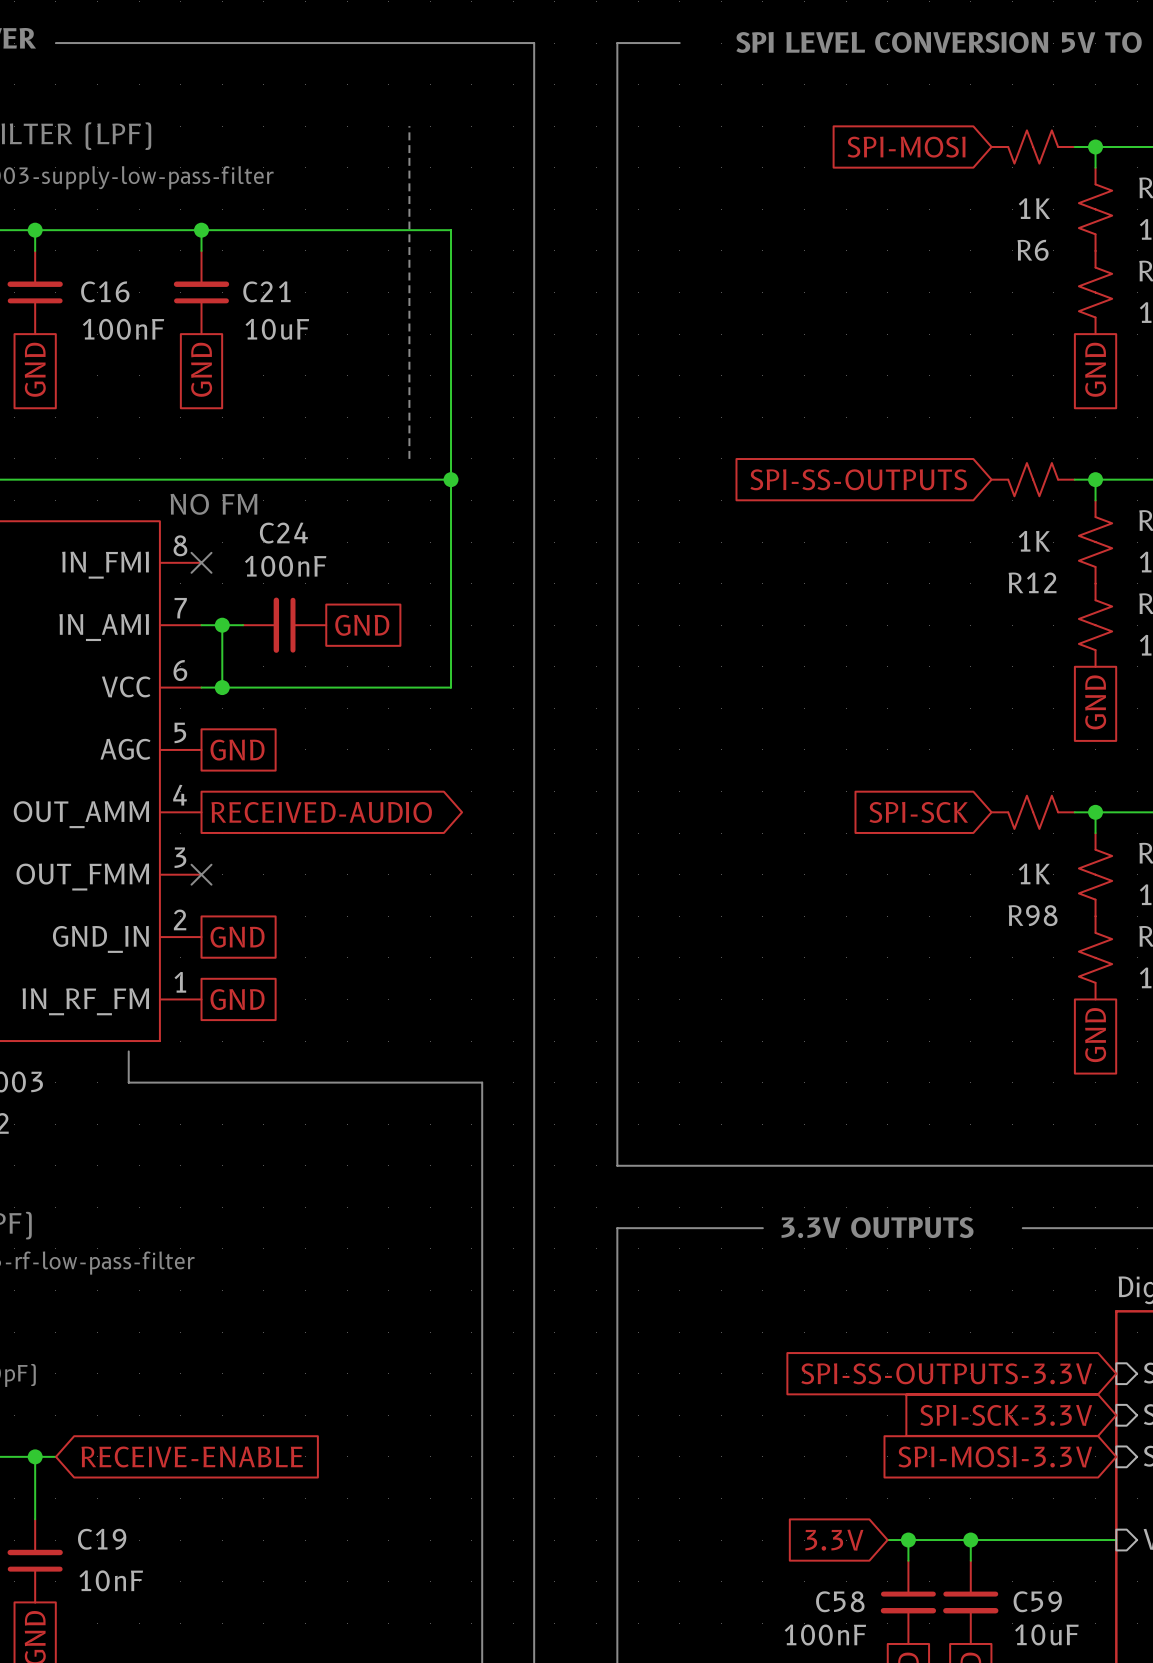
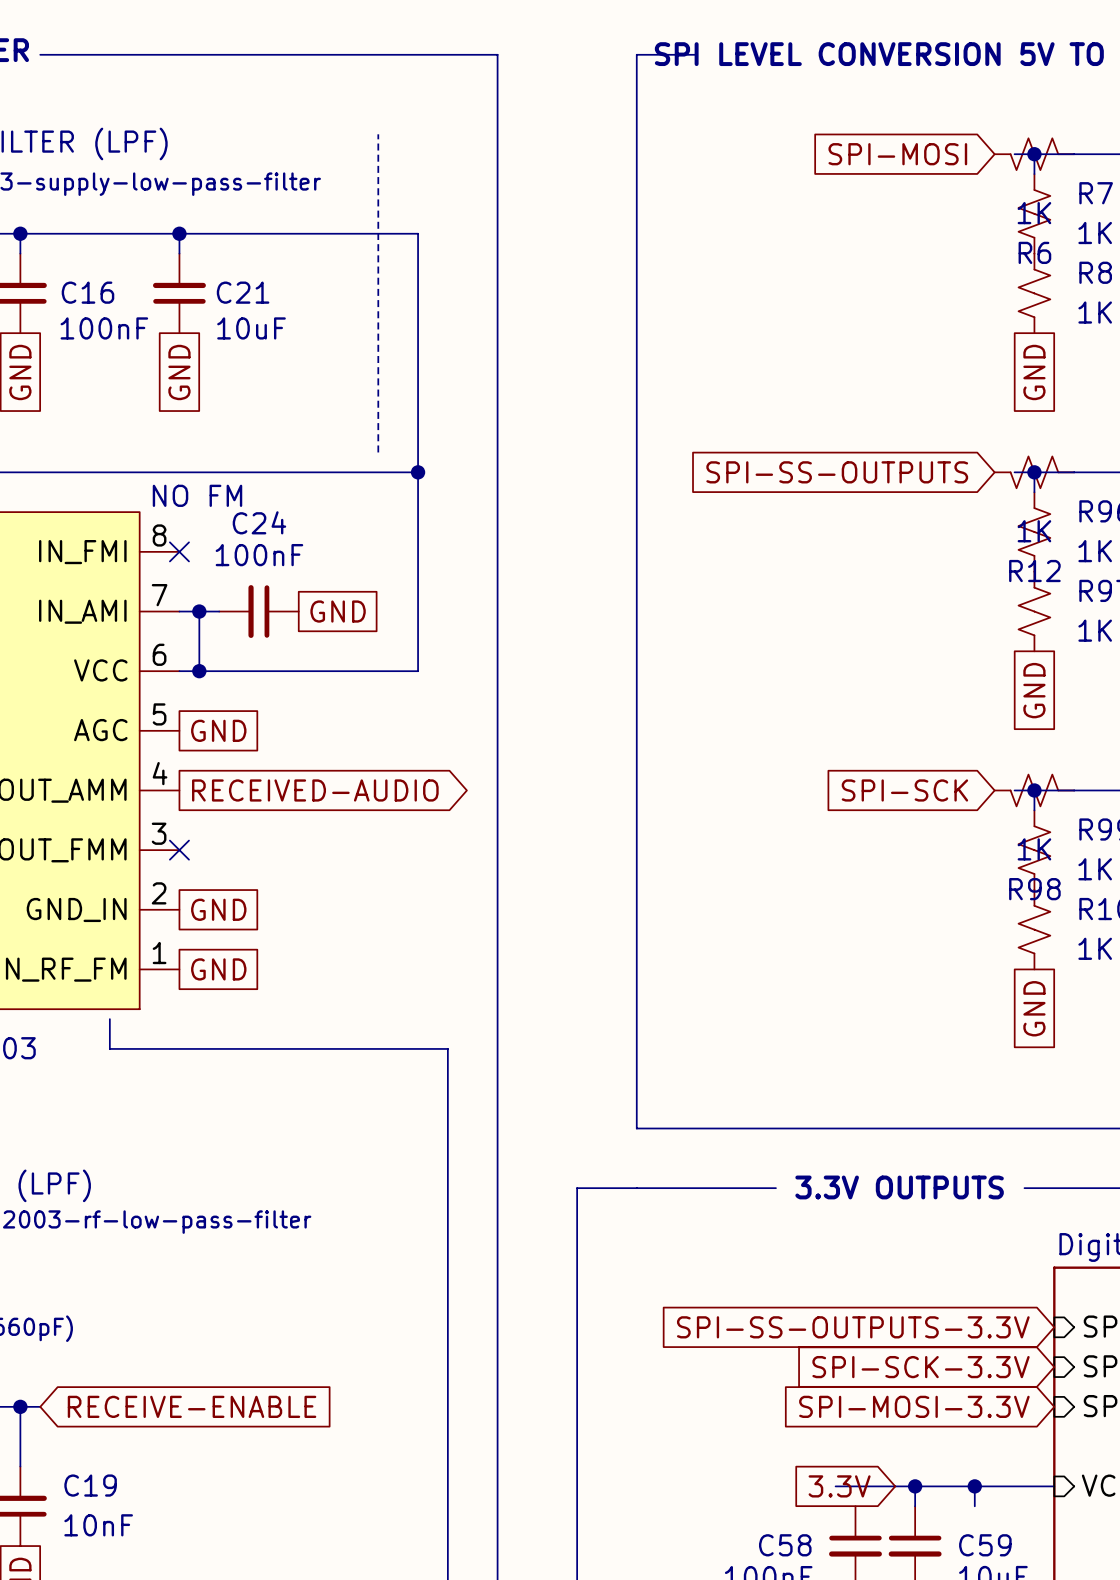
line: (679, 43) (617, 43) (617, 1165) (679, 1165) -> (696, 54) (636, 54) (636, 1128)
R6 position: (1033, 146) -> (1034, 154)
global label position: SPI-MOSI (906, 147) -> SPI-MOSI (897, 154)
global label position: SPI-SS-OUTPUTS (858, 479) -> SPI-SS-OUTPUTS (837, 472)
R12 position: (1033, 479) -> (1034, 472)
global label position: SPI-SCK (918, 812) -> SPI-SCK (904, 790)
R98 position: (1033, 812) -> (1034, 790)
text position: 3.3V OUTPUTS (877, 1227) -> 3.3V OUTPUTS (899, 1187)
line: (1022, 1228) (1085, 1228) -> (716, 1188) (775, 1188)
global label position: 3.3V (834, 1540) -> 3.3V (839, 1486)
wire: (908, 1540) (908, 1560) -> (974, 1486) (974, 1506)
junction: (908, 1540) -> none
junction: none -> (974, 1486)

